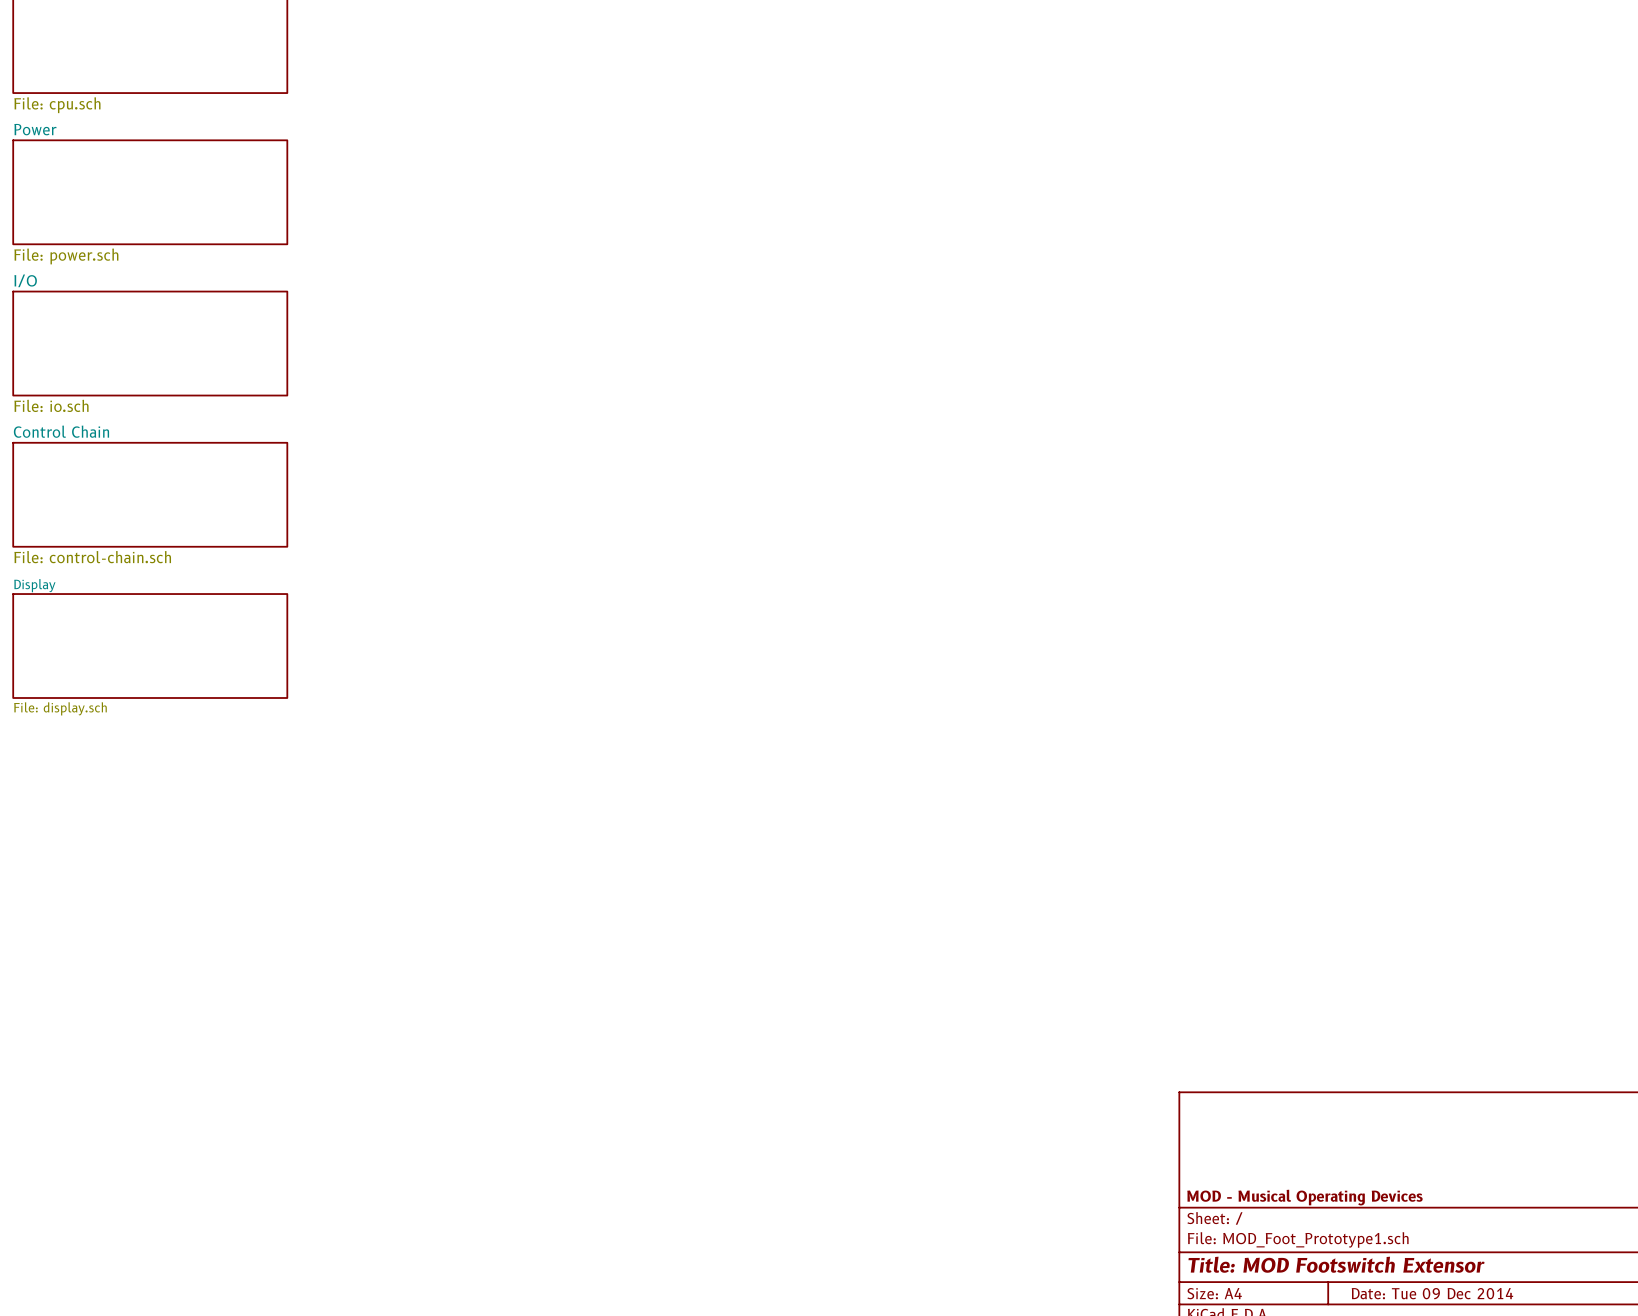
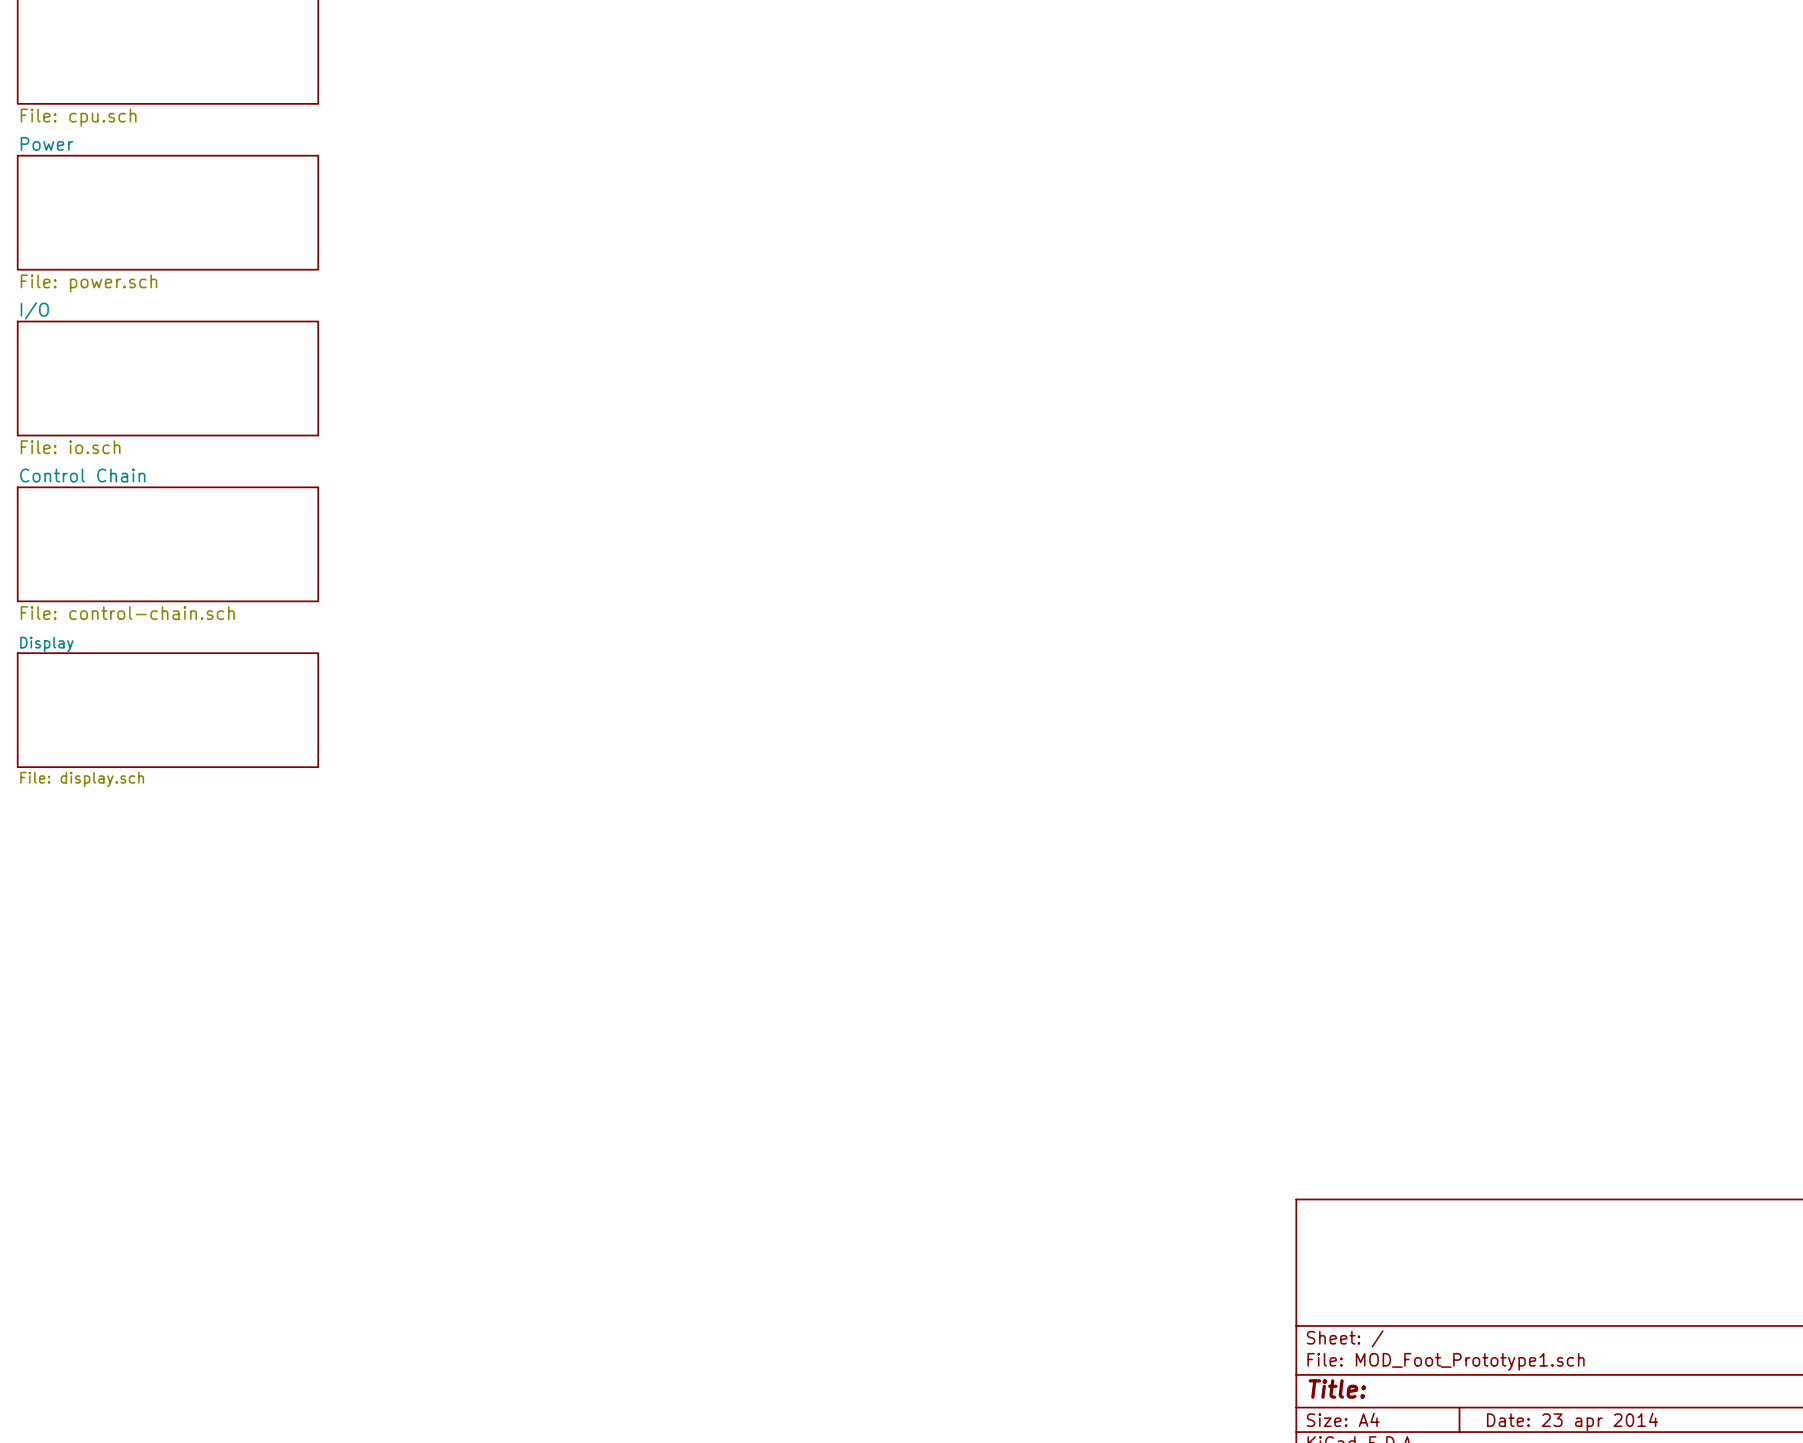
title block: MOD - Musical Operating Devices (1304, 1197) -> none
title block: Title: MOD Footswitch Extensor (1336, 1264) -> Title: (1337, 1389)
title block: Date: Tue 09 Dec 2014 (1432, 1293) -> Date: 23 apr 2014 (1572, 1421)

